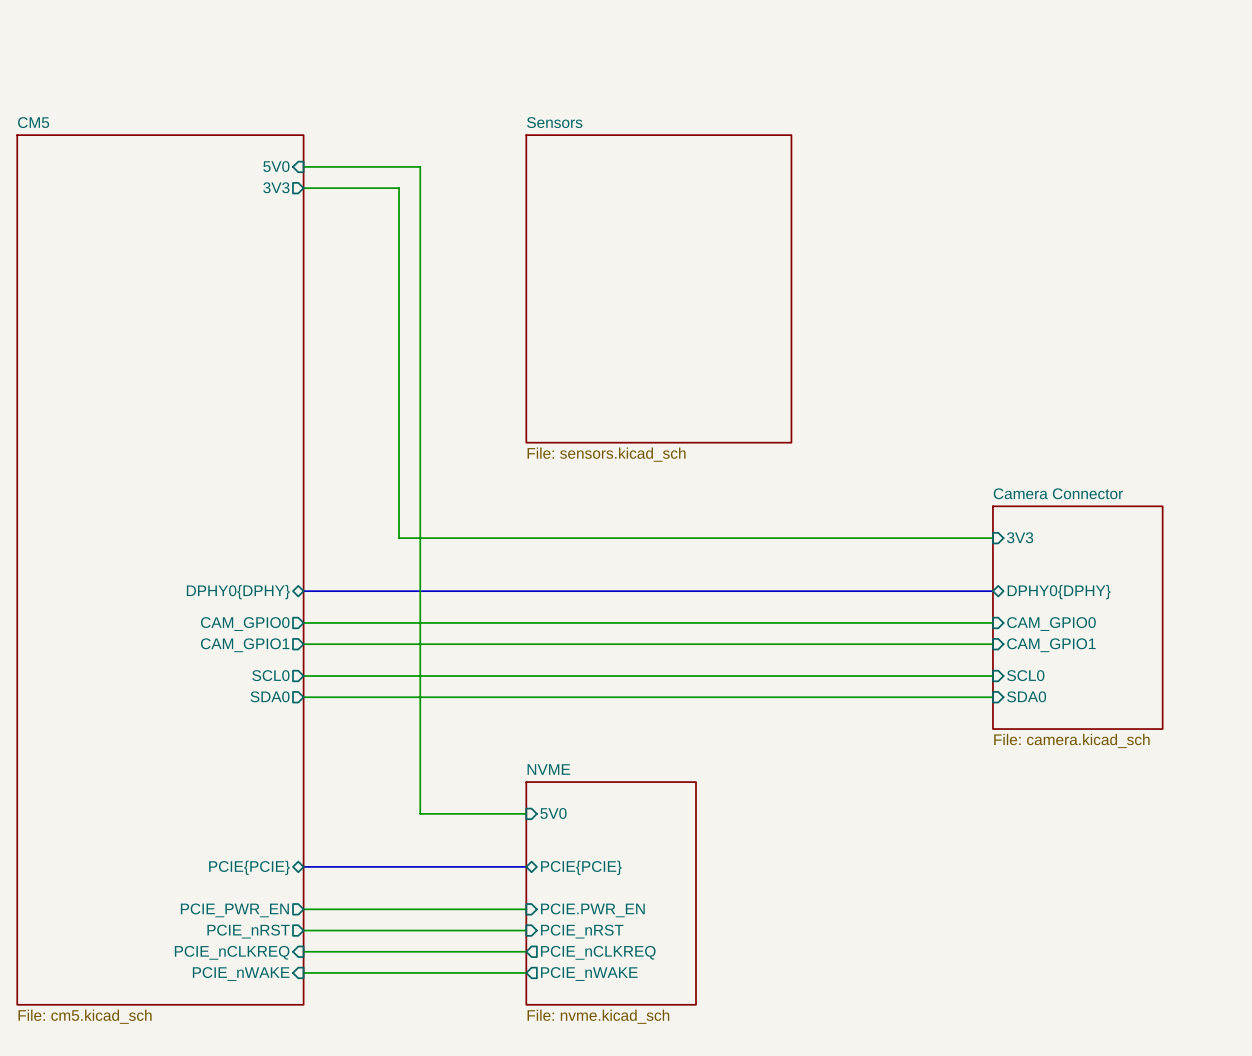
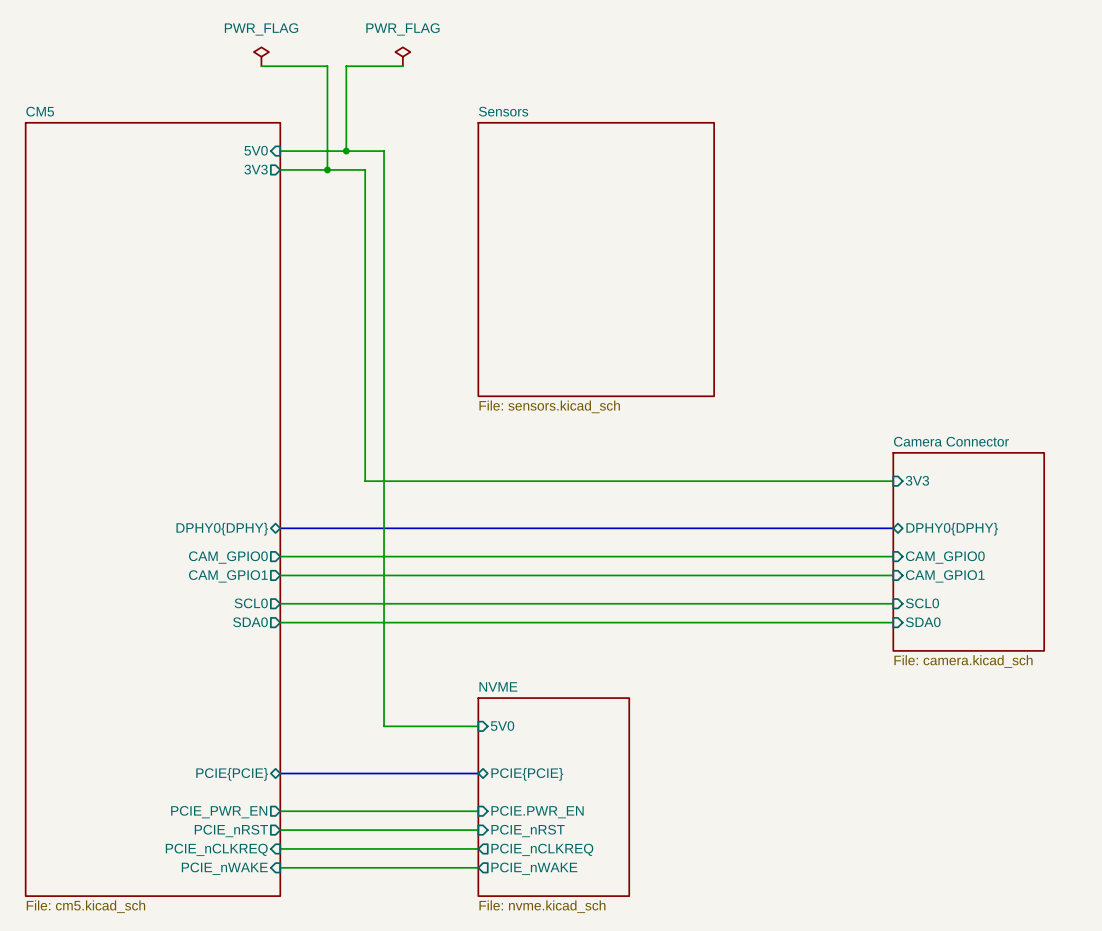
power symbol: none -> PWR_FLAG (261, 56)
power symbol: none -> PWR_FLAG (402, 56)
wire: none -> (261, 66) (327, 66) (327, 169)
wire: none -> (402, 66) (346, 66) (346, 151)
junction: none -> (346, 151)
junction: none -> (327, 169)

